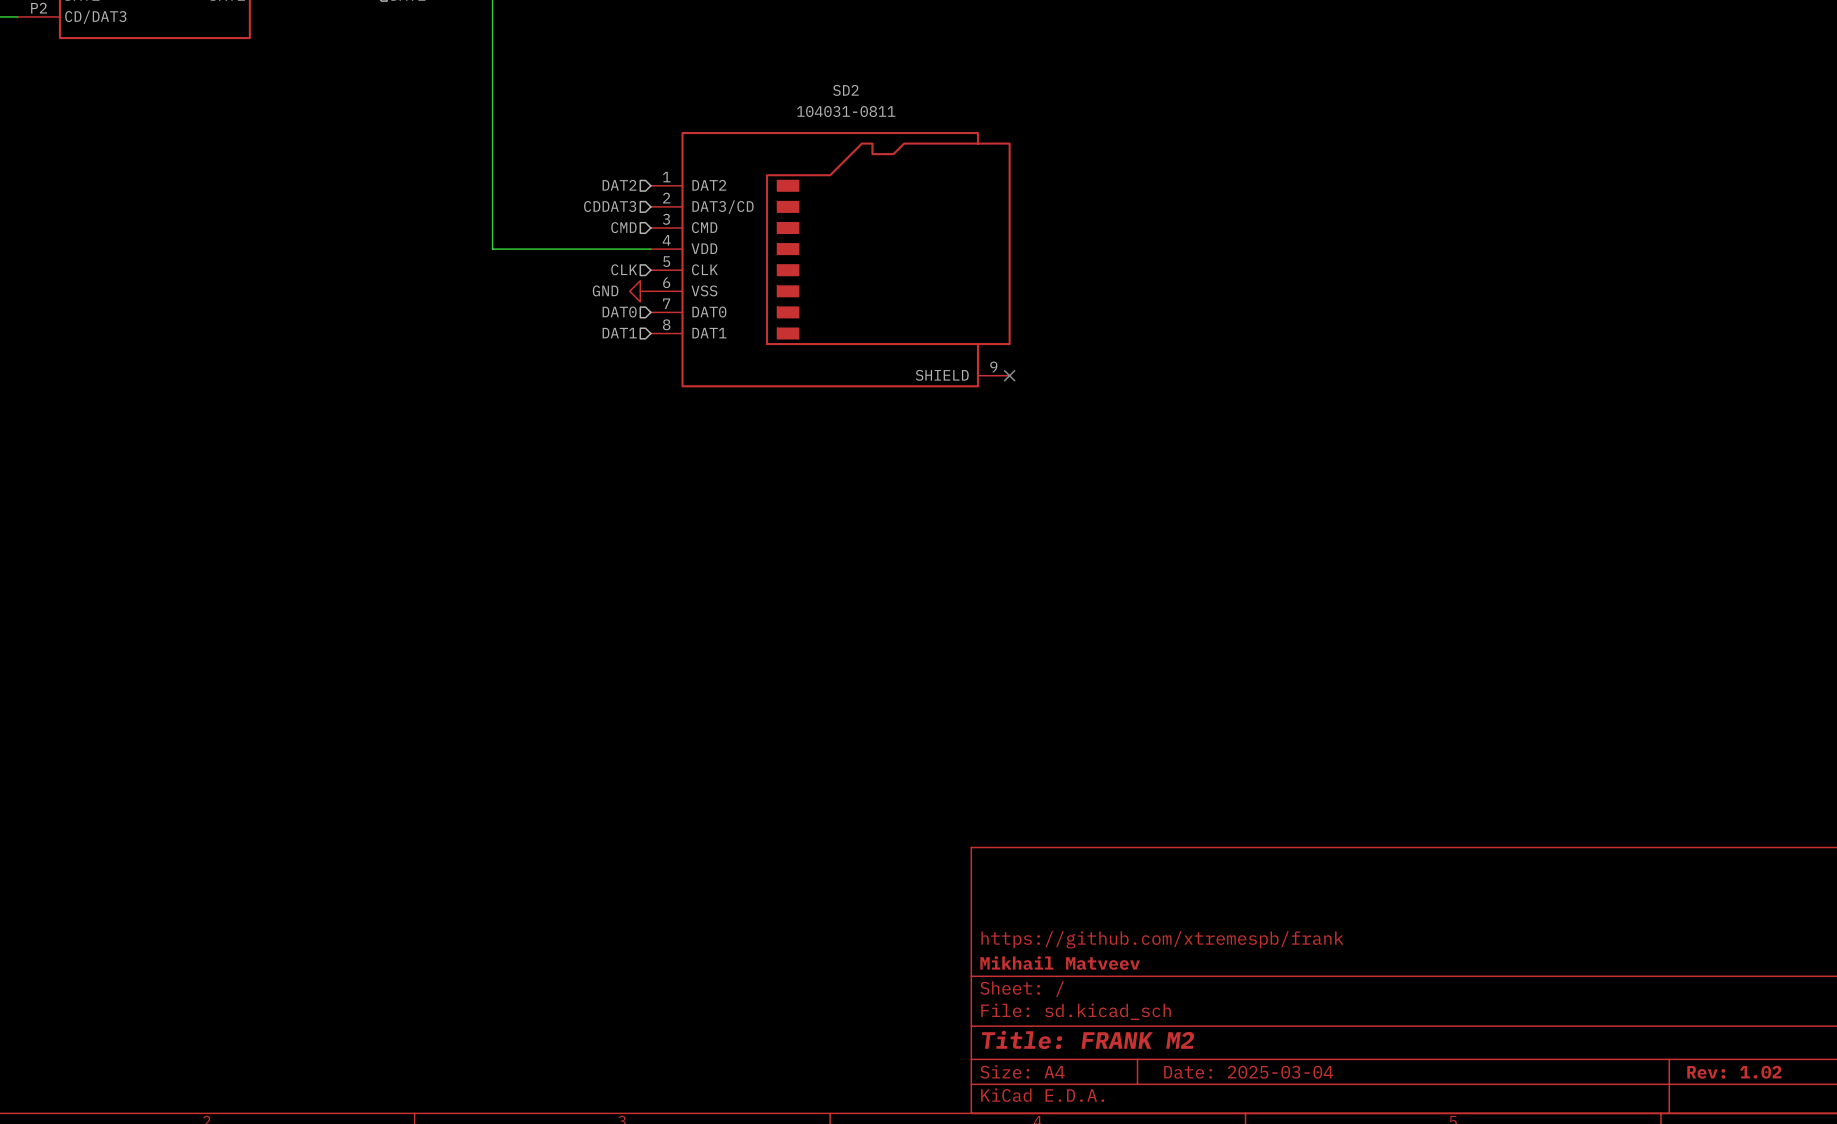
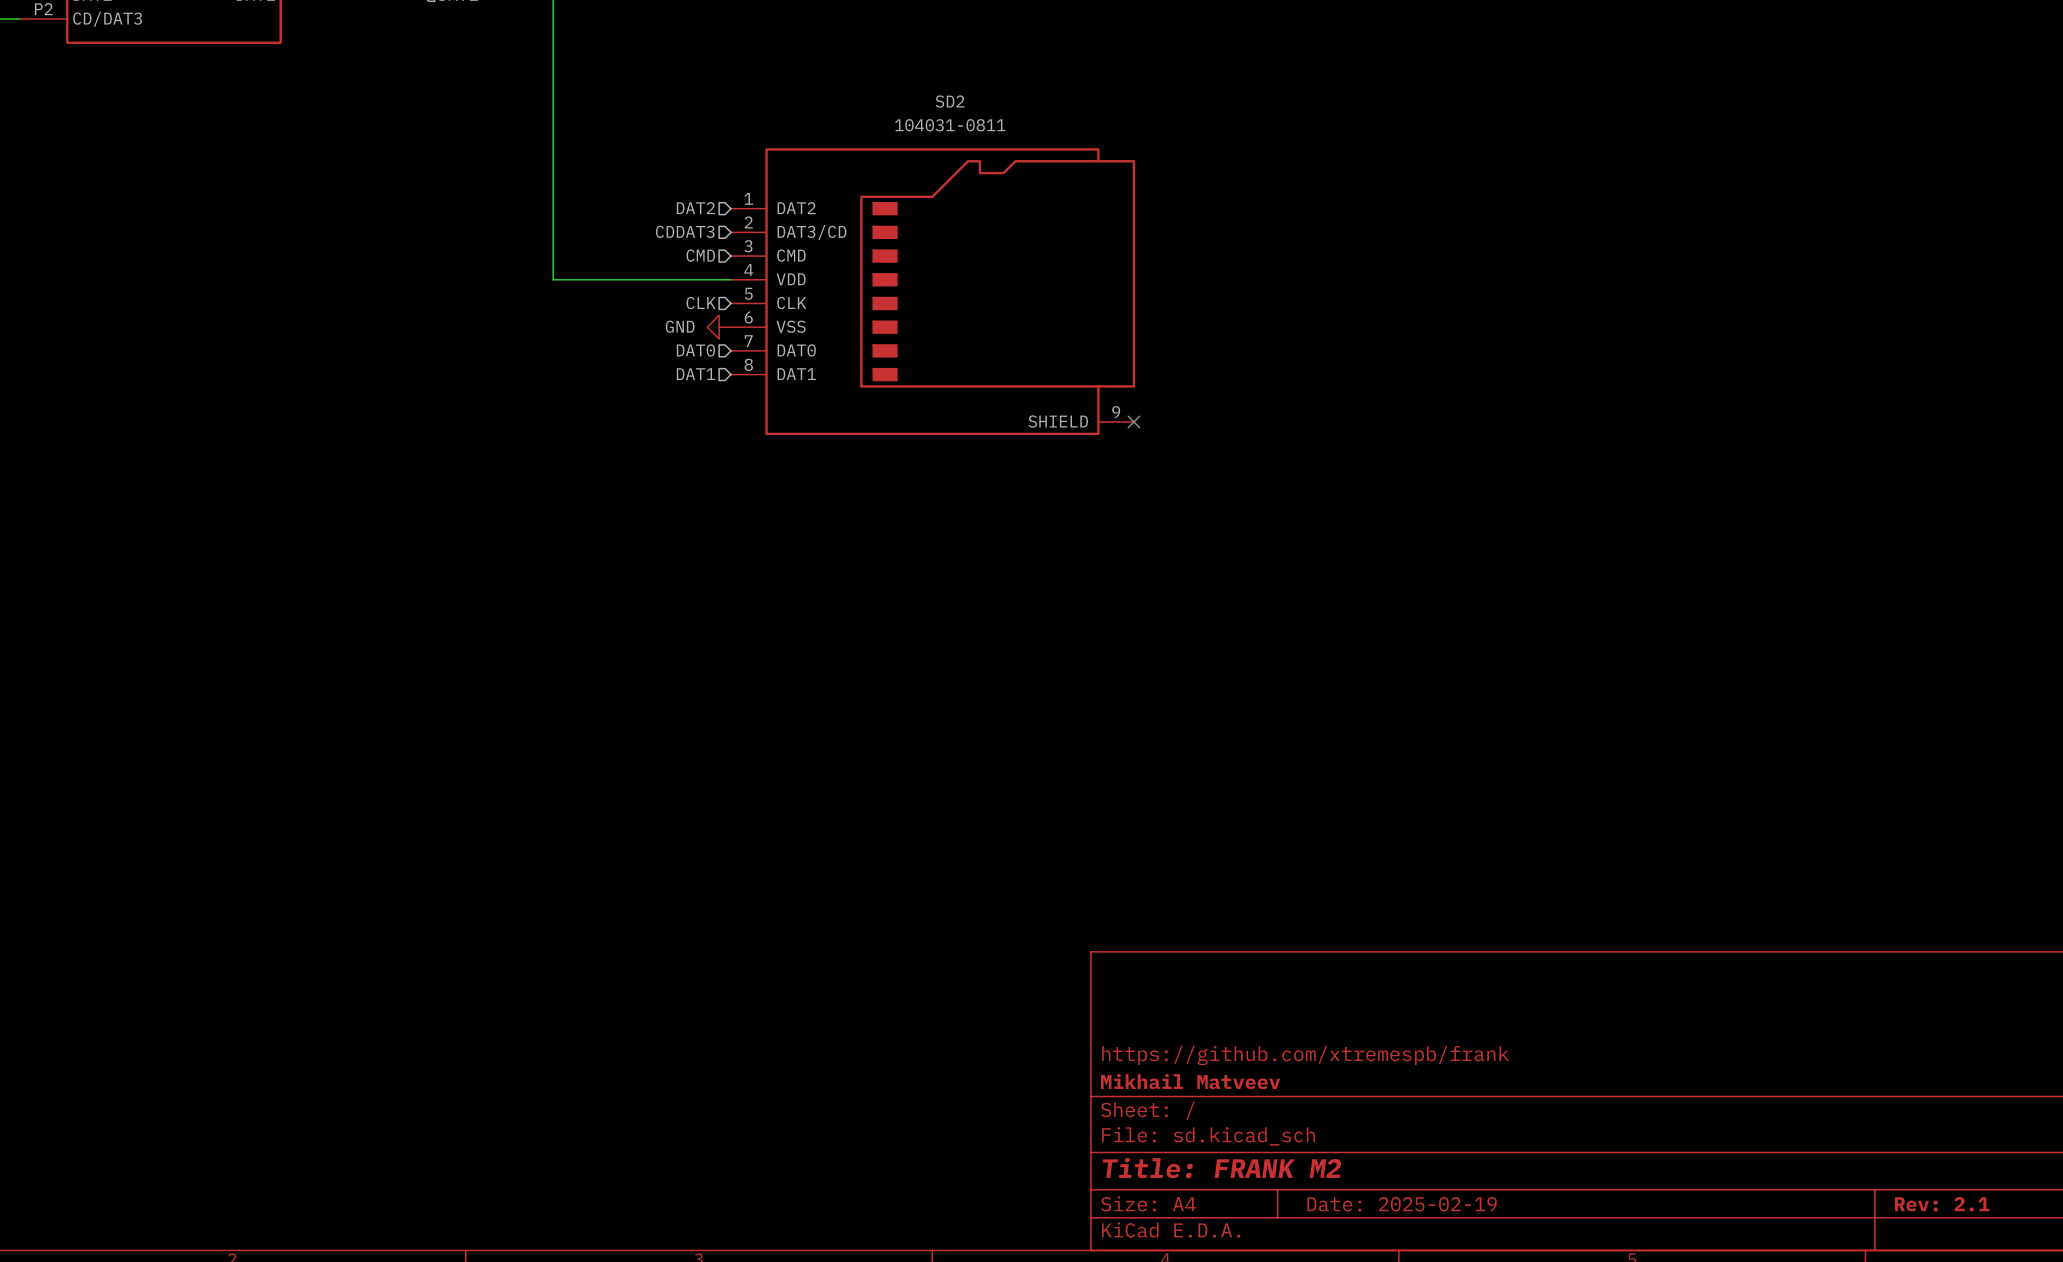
title block: Date: 2025-03-04 (1248, 1072) -> Date: 2025-02-19 (1402, 1204)
title block: Rev: 1.02 (1734, 1072) -> Rev: 2.1 (1942, 1204)

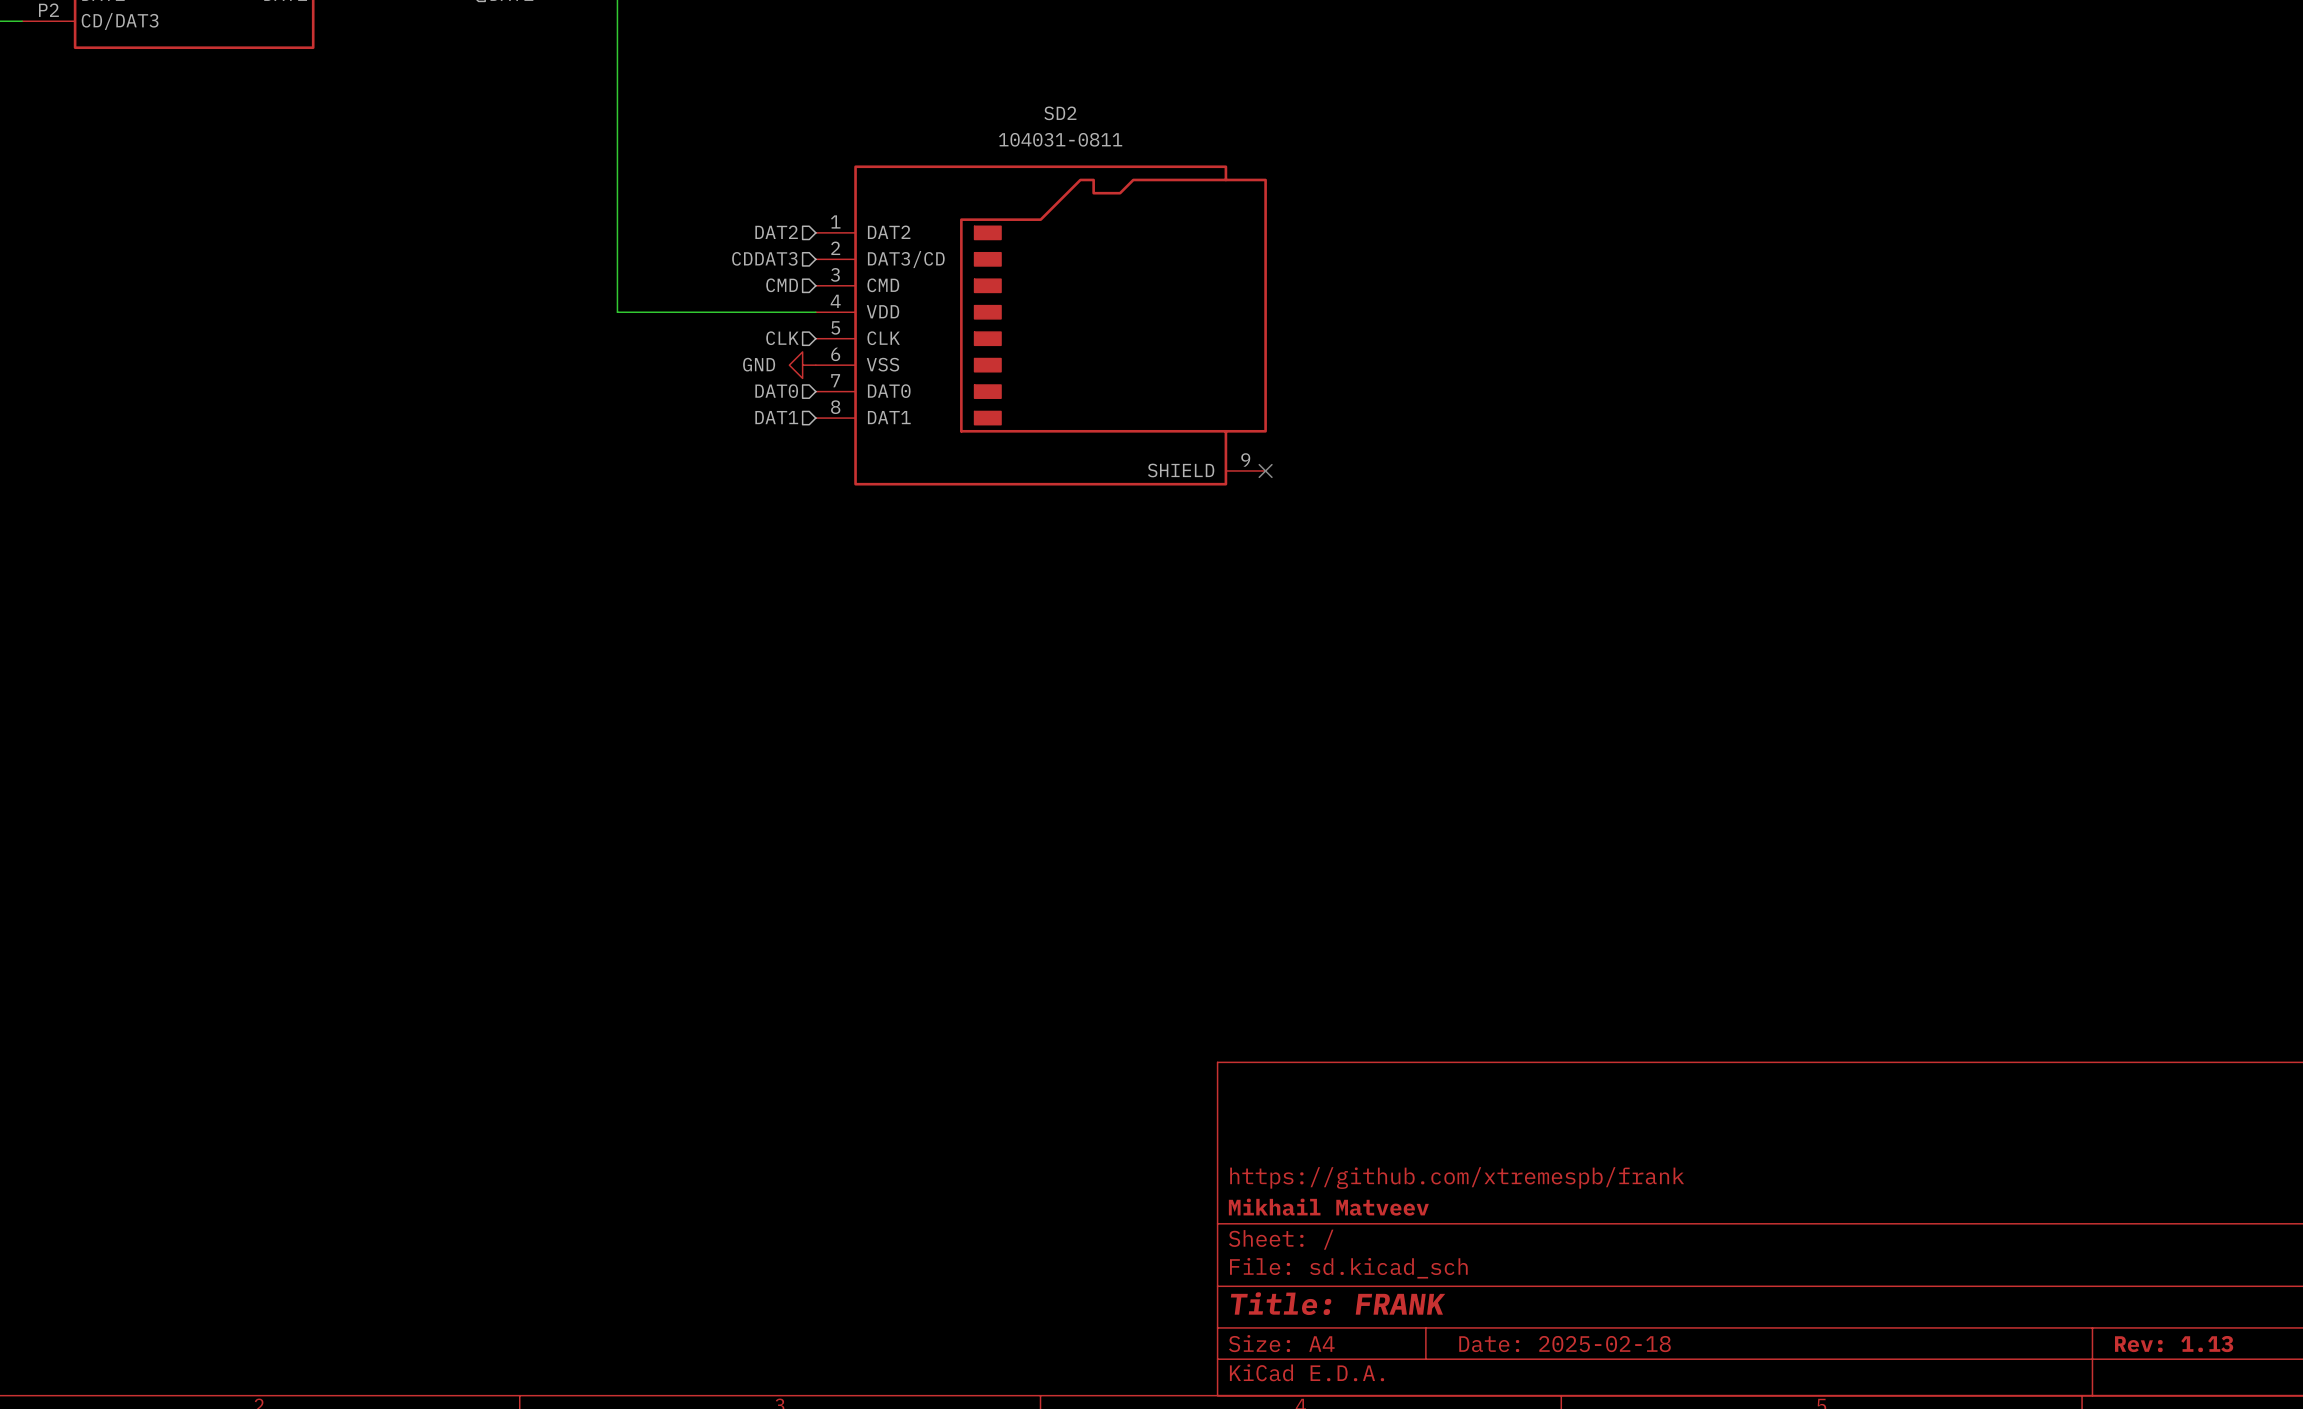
title block: Title: FRANK M2 (1221, 1168) -> Title: FRANK (1338, 1303)
title block: Date: 2025-02-19 (1402, 1204) -> Date: 2025-02-18 (1565, 1344)
title block: Rev: 2.1 (1942, 1204) -> Rev: 1.13 (2174, 1344)

